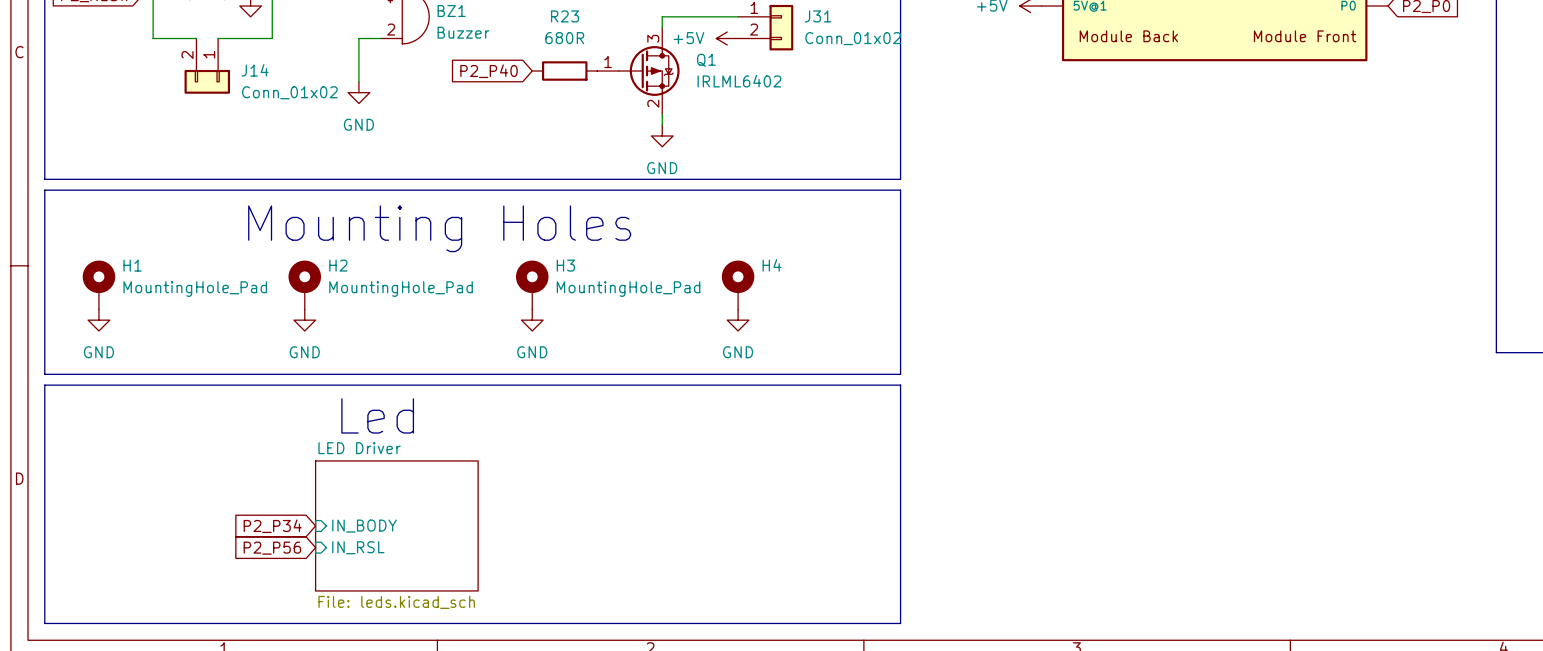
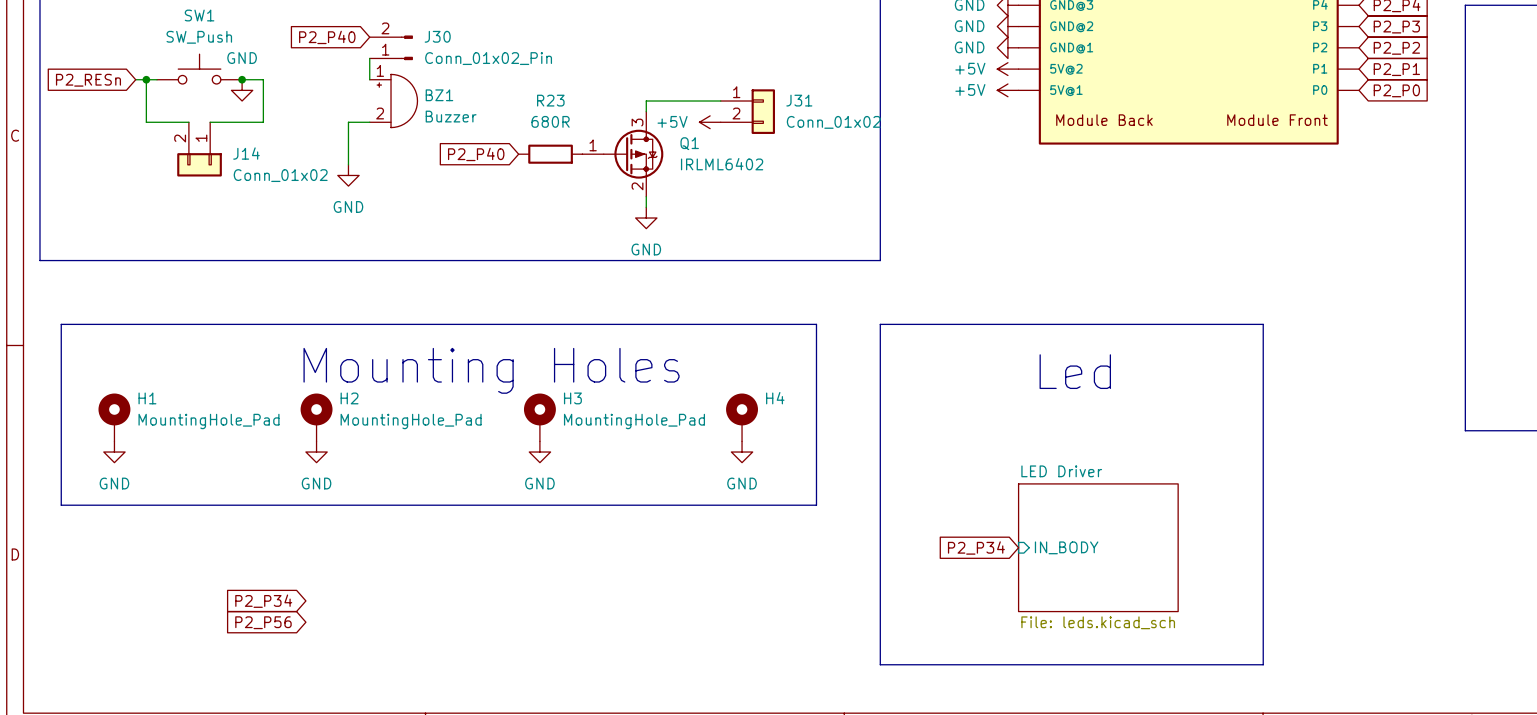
text position: Mounting Holes (439, 228) -> Mounting Holes (491, 370)
line: none -> (61, 324) (816, 324) (816, 505) (61, 505) (61, 324)
line: (900, 244) (900, 190) (44, 190) (44, 374) (900, 374) -> (880, 462) (880, 452)
H1 position: (98, 284) -> (114, 417)
H2 position: (304, 284) -> (316, 417)
H3 position: (532, 284) -> (539, 417)
H4 position: (738, 284) -> (742, 417)
text: none -> Led (1075, 371)
power symbol position: GND (98, 320) -> GND (114, 452)
power symbol position: GND (304, 320) -> GND (316, 452)
power symbol position: GND (532, 320) -> GND (539, 452)
power symbol position: GND (738, 320) -> GND (742, 452)
line: (900, 385) (44, 385) (44, 623) (900, 623) (900, 590) -> (880, 324) (1263, 324) (1263, 664) (880, 664)
text: Led (377, 415) -> none
sheet pin: none -> IN_BODY (1066, 547)
sheet LED Driver: none -> File: leds.kicad_sch (1098, 547)
global label: none -> P2_P34 (976, 548)
sheet LED Driver: File: leds.kicad_sch (396, 525) -> none
sheet pin: IN_BODY (364, 526) -> none
sheet pin: IN_RSL (358, 547) -> none

